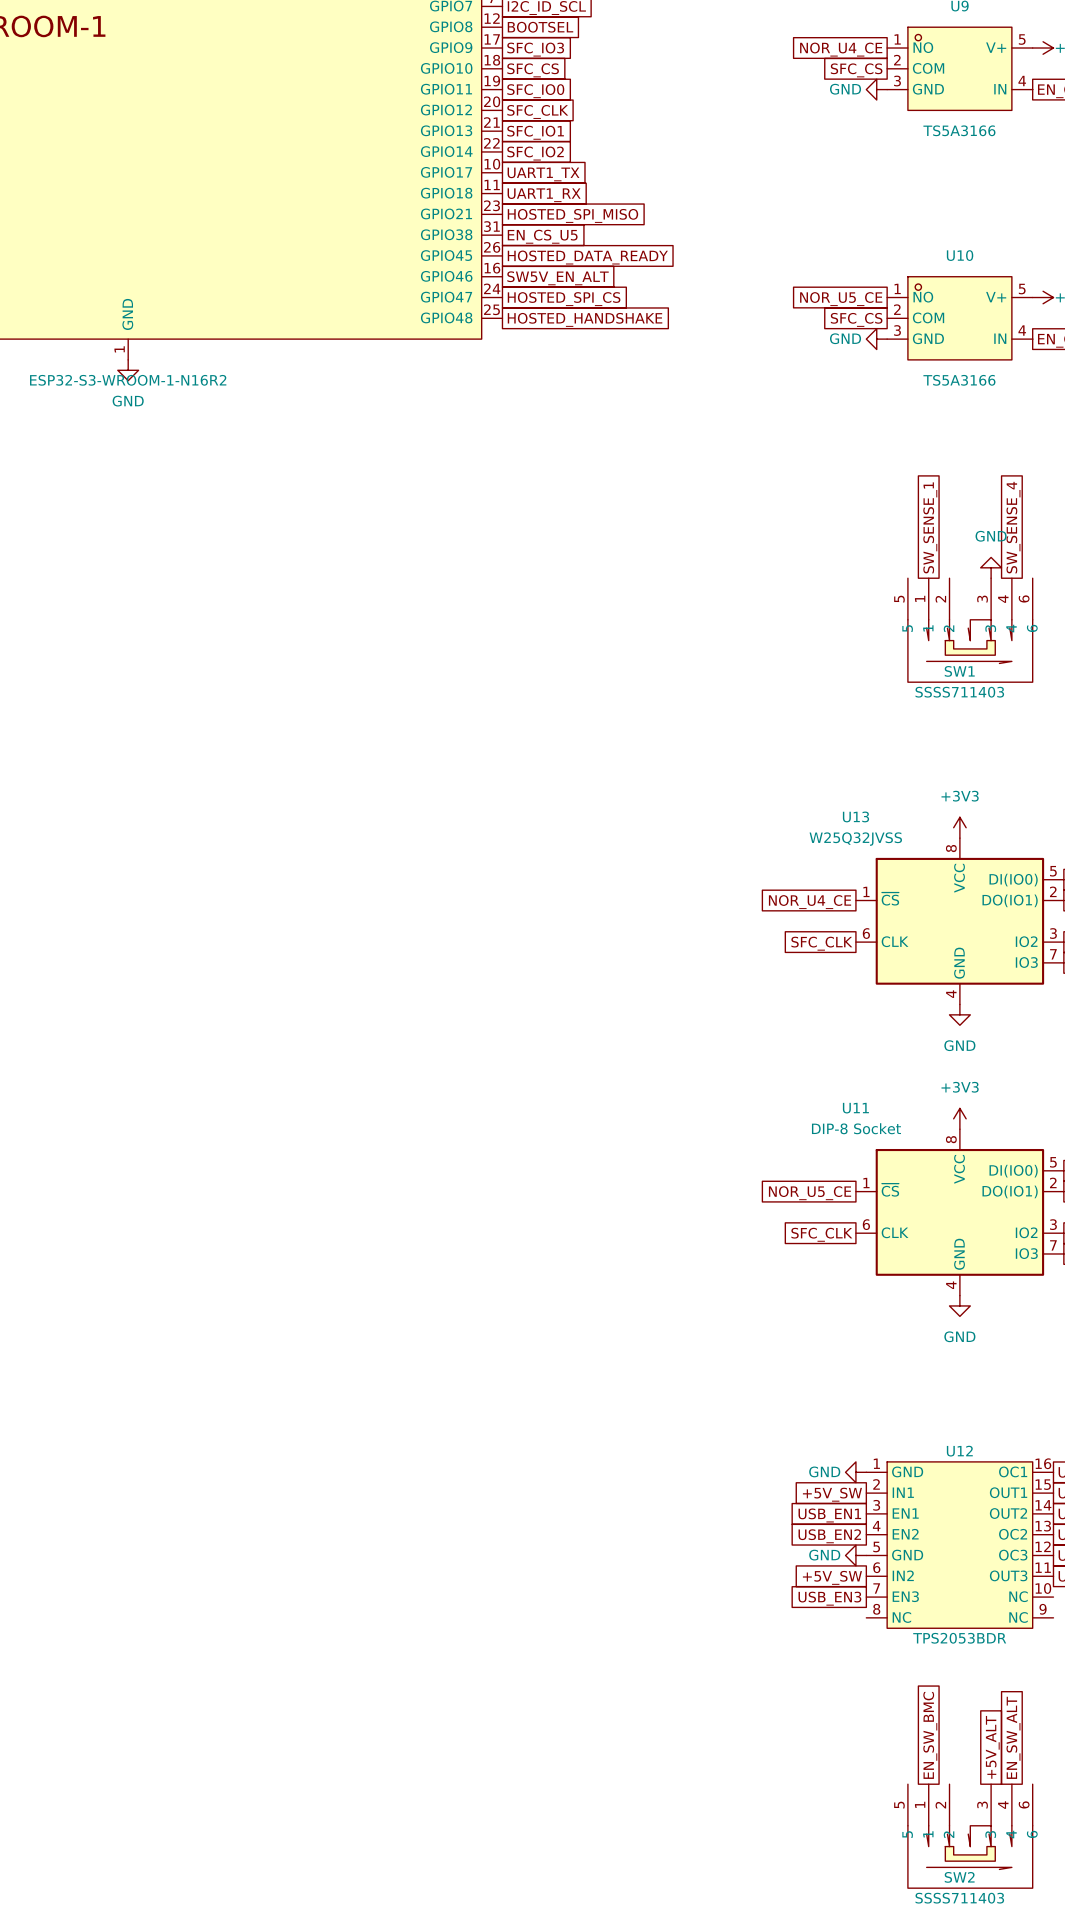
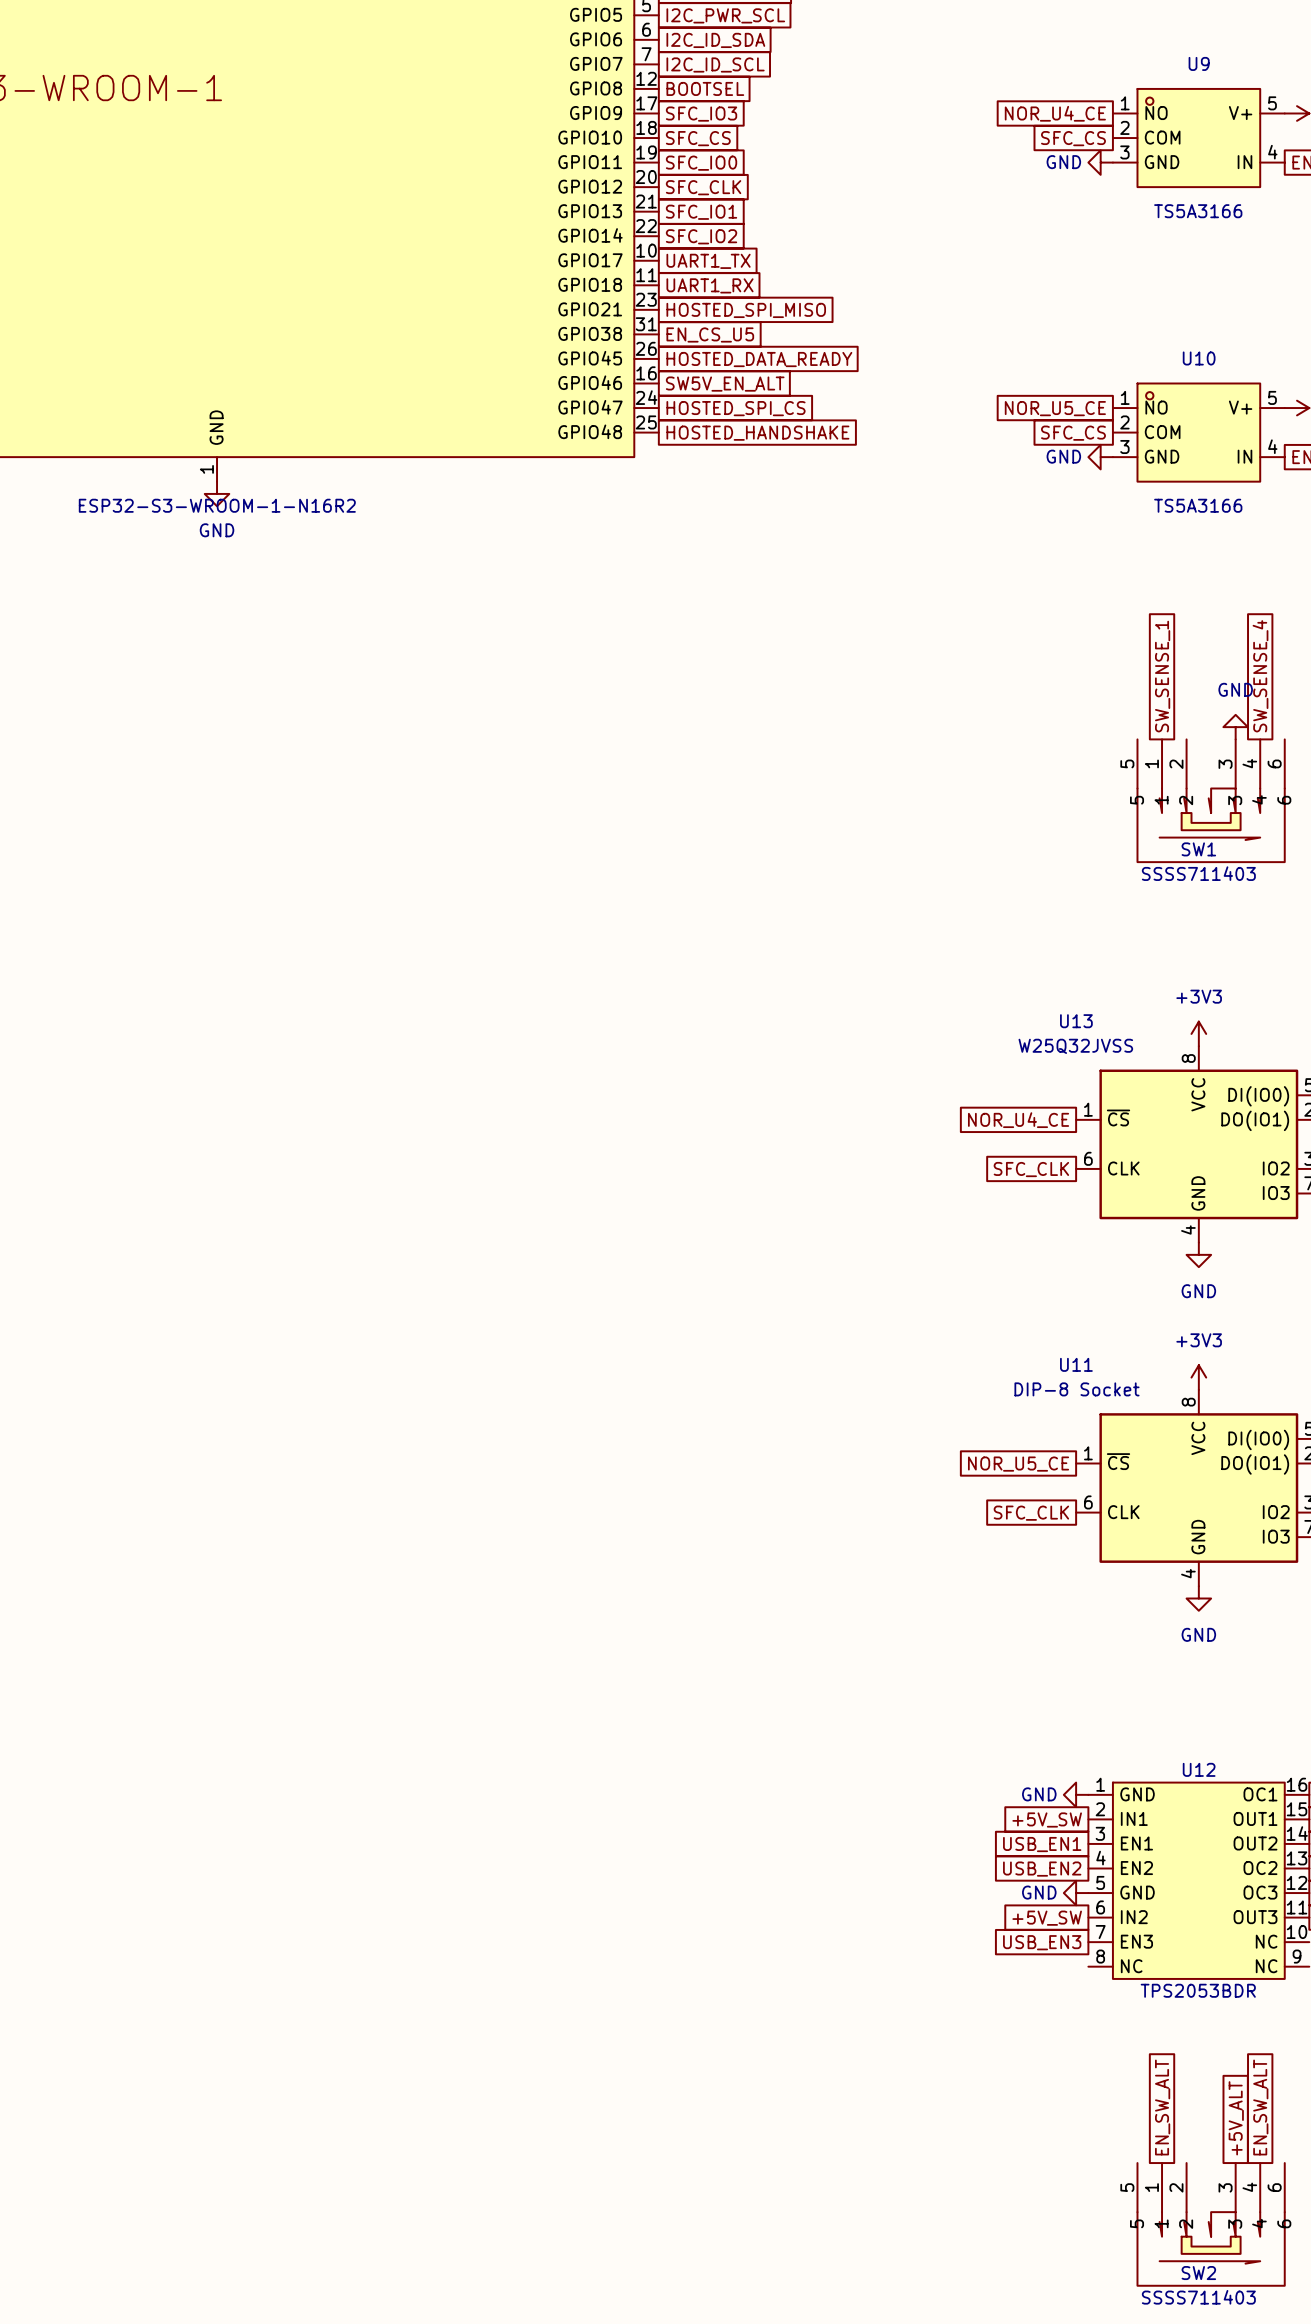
global label: EN_SW_BMC (930, 1735) -> EN_SW_ALT (1162, 2107)

